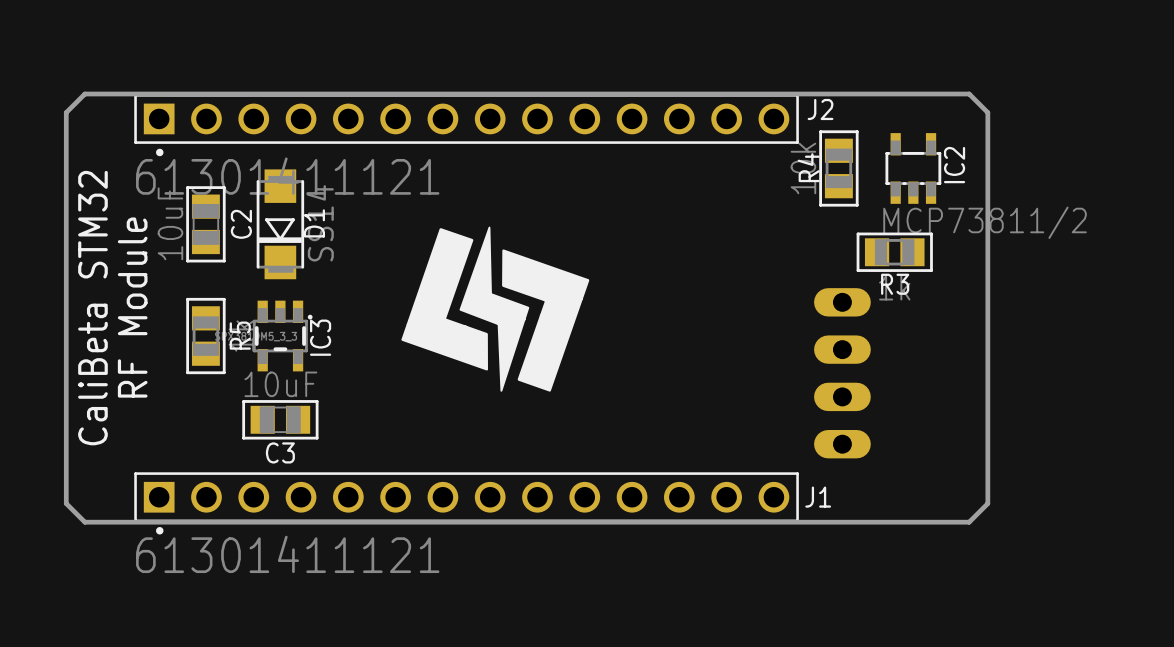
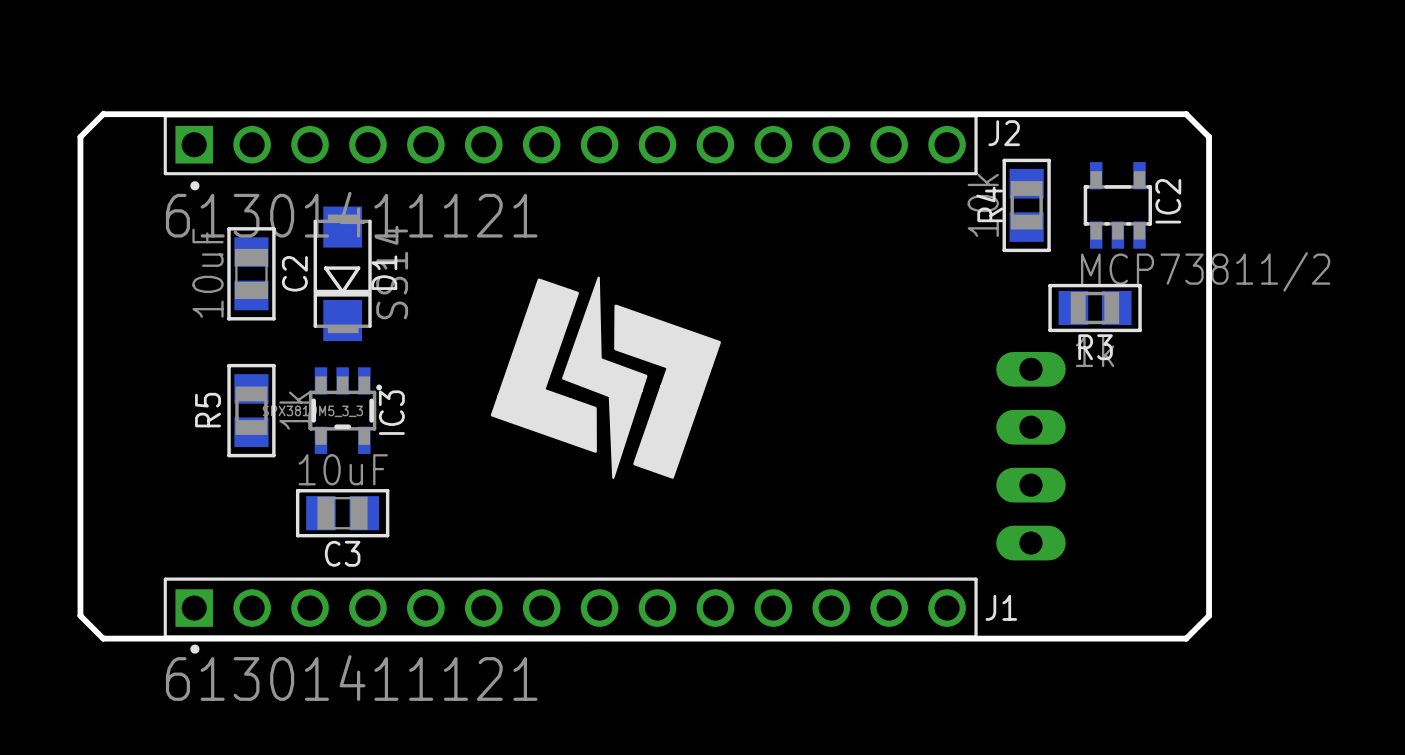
text: RF Module (132, 307) -> none
text: CaliBeta STM32 (92, 308) -> none
R5 name position: R5 (240, 335) -> R5 (208, 410)

